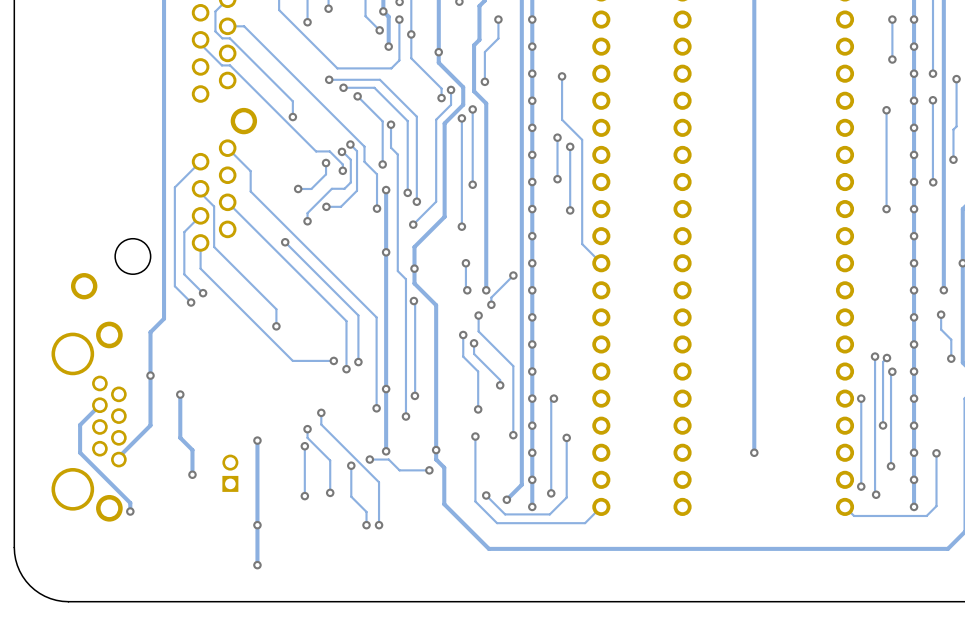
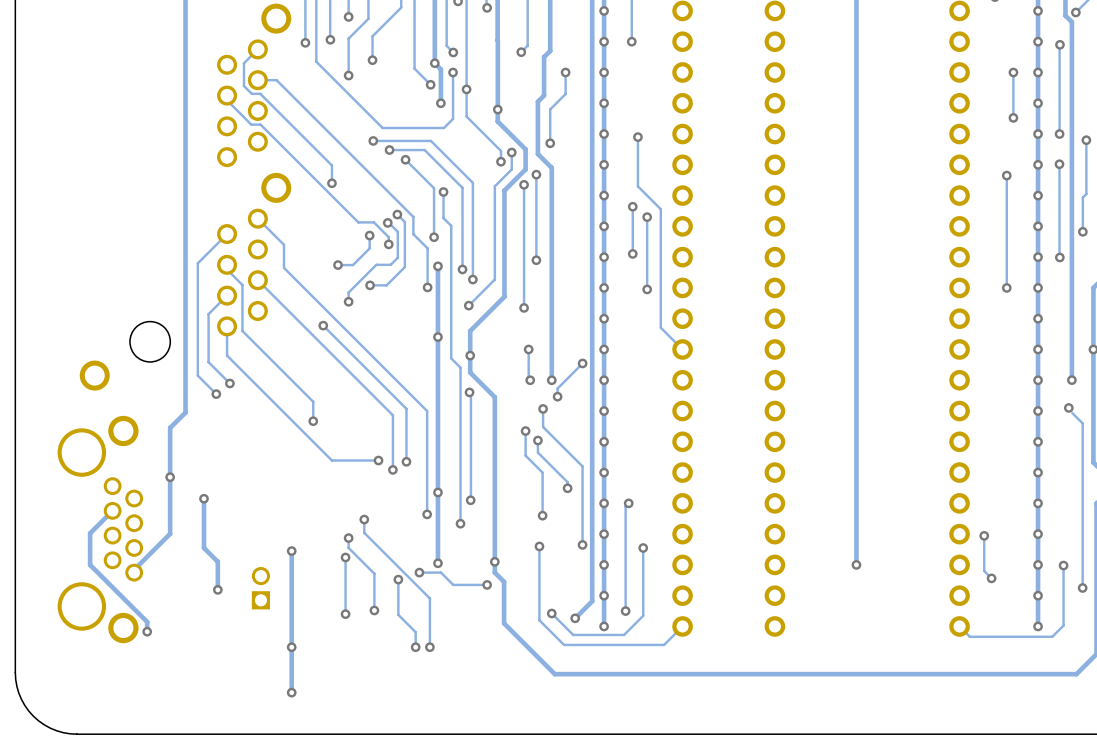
track: (941, 314) (941, 329) (951, 339) (951, 358) -> none
track: none -> (1072, 413) (1082, 423) (1082, 587)
track: (875, 356) (876, 494) -> none
via: (875, 356) -> none
track: (886, 358) (883, 361) (883, 425) -> none
via: (886, 358) -> none
via: (951, 358) -> none
track: (892, 371) (891, 466) -> none
via: (892, 371) -> none
track: (861, 398) (861, 486) -> none
via: (861, 398) -> none
via: (883, 425) -> none
track: none -> (984, 535) (984, 571) (991, 578)
via: none -> (984, 535)
via: none -> (991, 578)
via: (891, 466) -> none
via: none -> (1082, 587)
via: (861, 486) -> none
via: (876, 494) -> none

